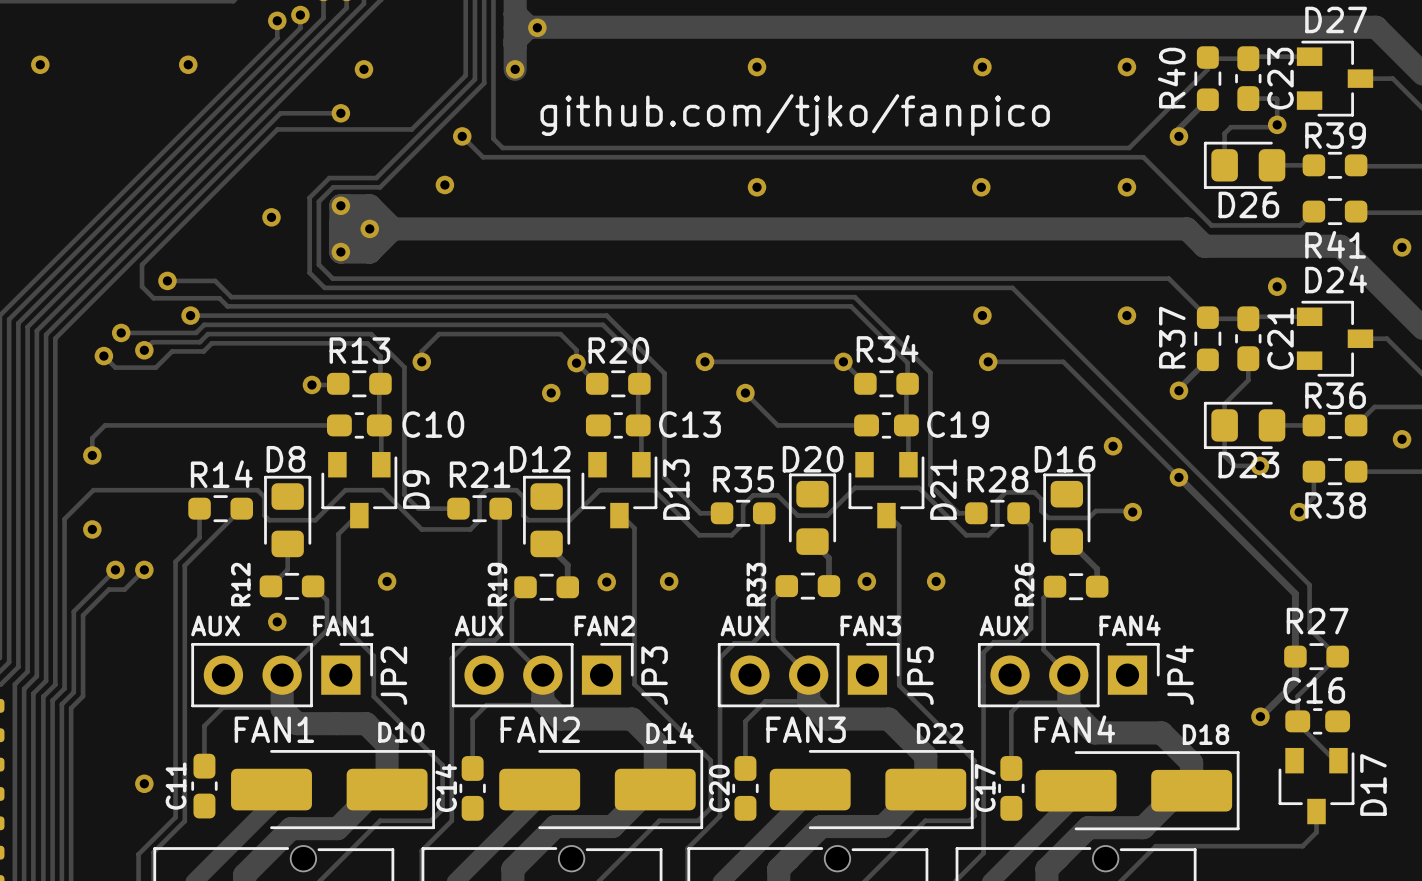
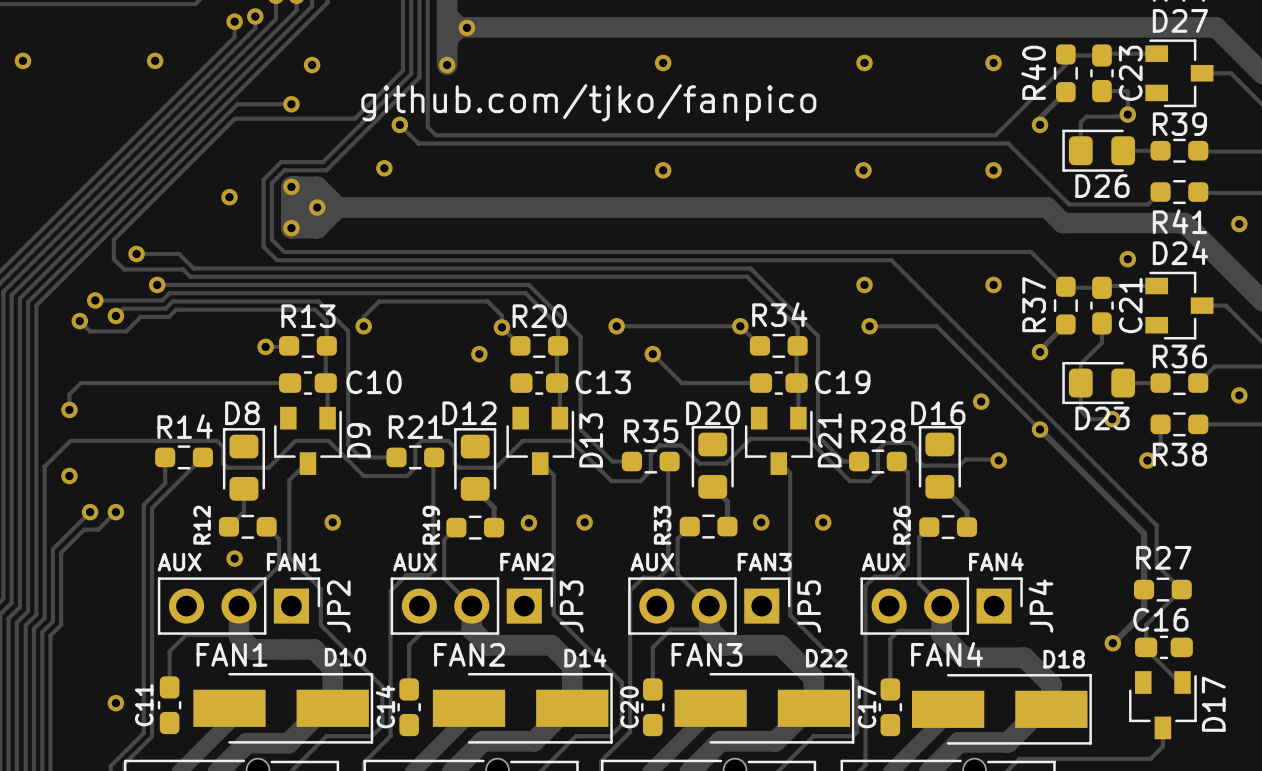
text position: github.com/tjko/fanpico (795, 115) -> github.com/tjko/fanpico (588, 102)
D10 footprint: [231, 750, 435, 830] -> [193, 672, 374, 744]
D14 footprint: [499, 750, 704, 830] -> [432, 672, 613, 744]
D22 footprint: [769, 750, 974, 830] -> [674, 672, 855, 744]
D18 footprint: [1035, 751, 1240, 831] -> [911, 674, 1092, 745]

